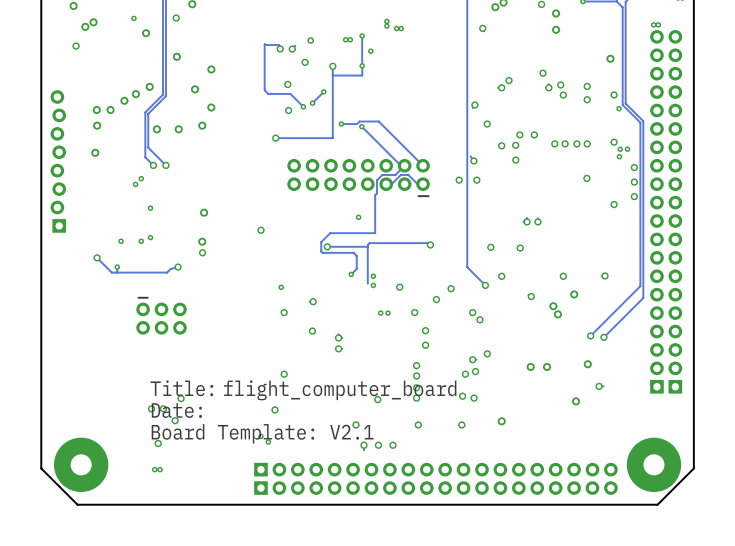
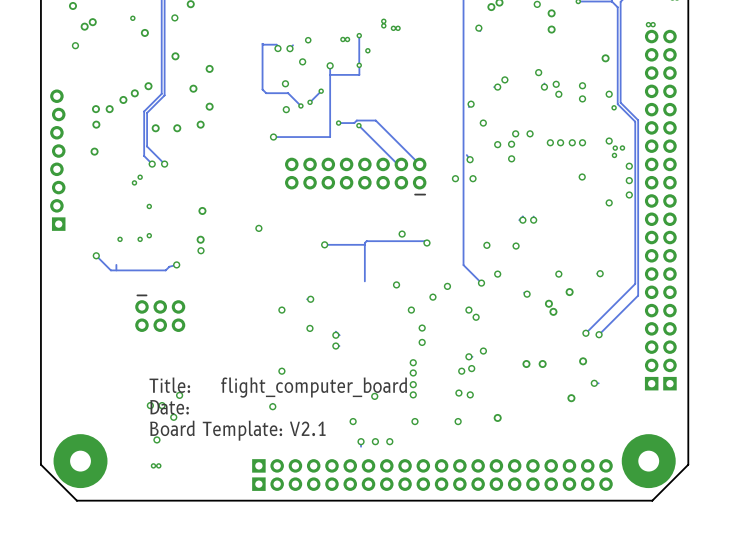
track: (404, 165) (395, 174) (382, 174) (377, 180) (375, 233) (330, 233) (321, 242) (322, 252) (353, 252) (356, 256) (356, 268) (351, 274) -> none
track: (423, 184) (417, 184) (408, 174) (400, 174) (391, 184) (386, 184) -> none
via: (358, 217) -> none
via: none -> (402, 234)
via: (117, 267) -> none
via: (351, 274) -> none
via: (373, 276) -> none
via: (373, 285) -> none
via: (281, 287) -> none
via: (380, 313) -> none
via: (388, 313) -> none
via: (260, 436) -> none
via: (268, 442) -> none

